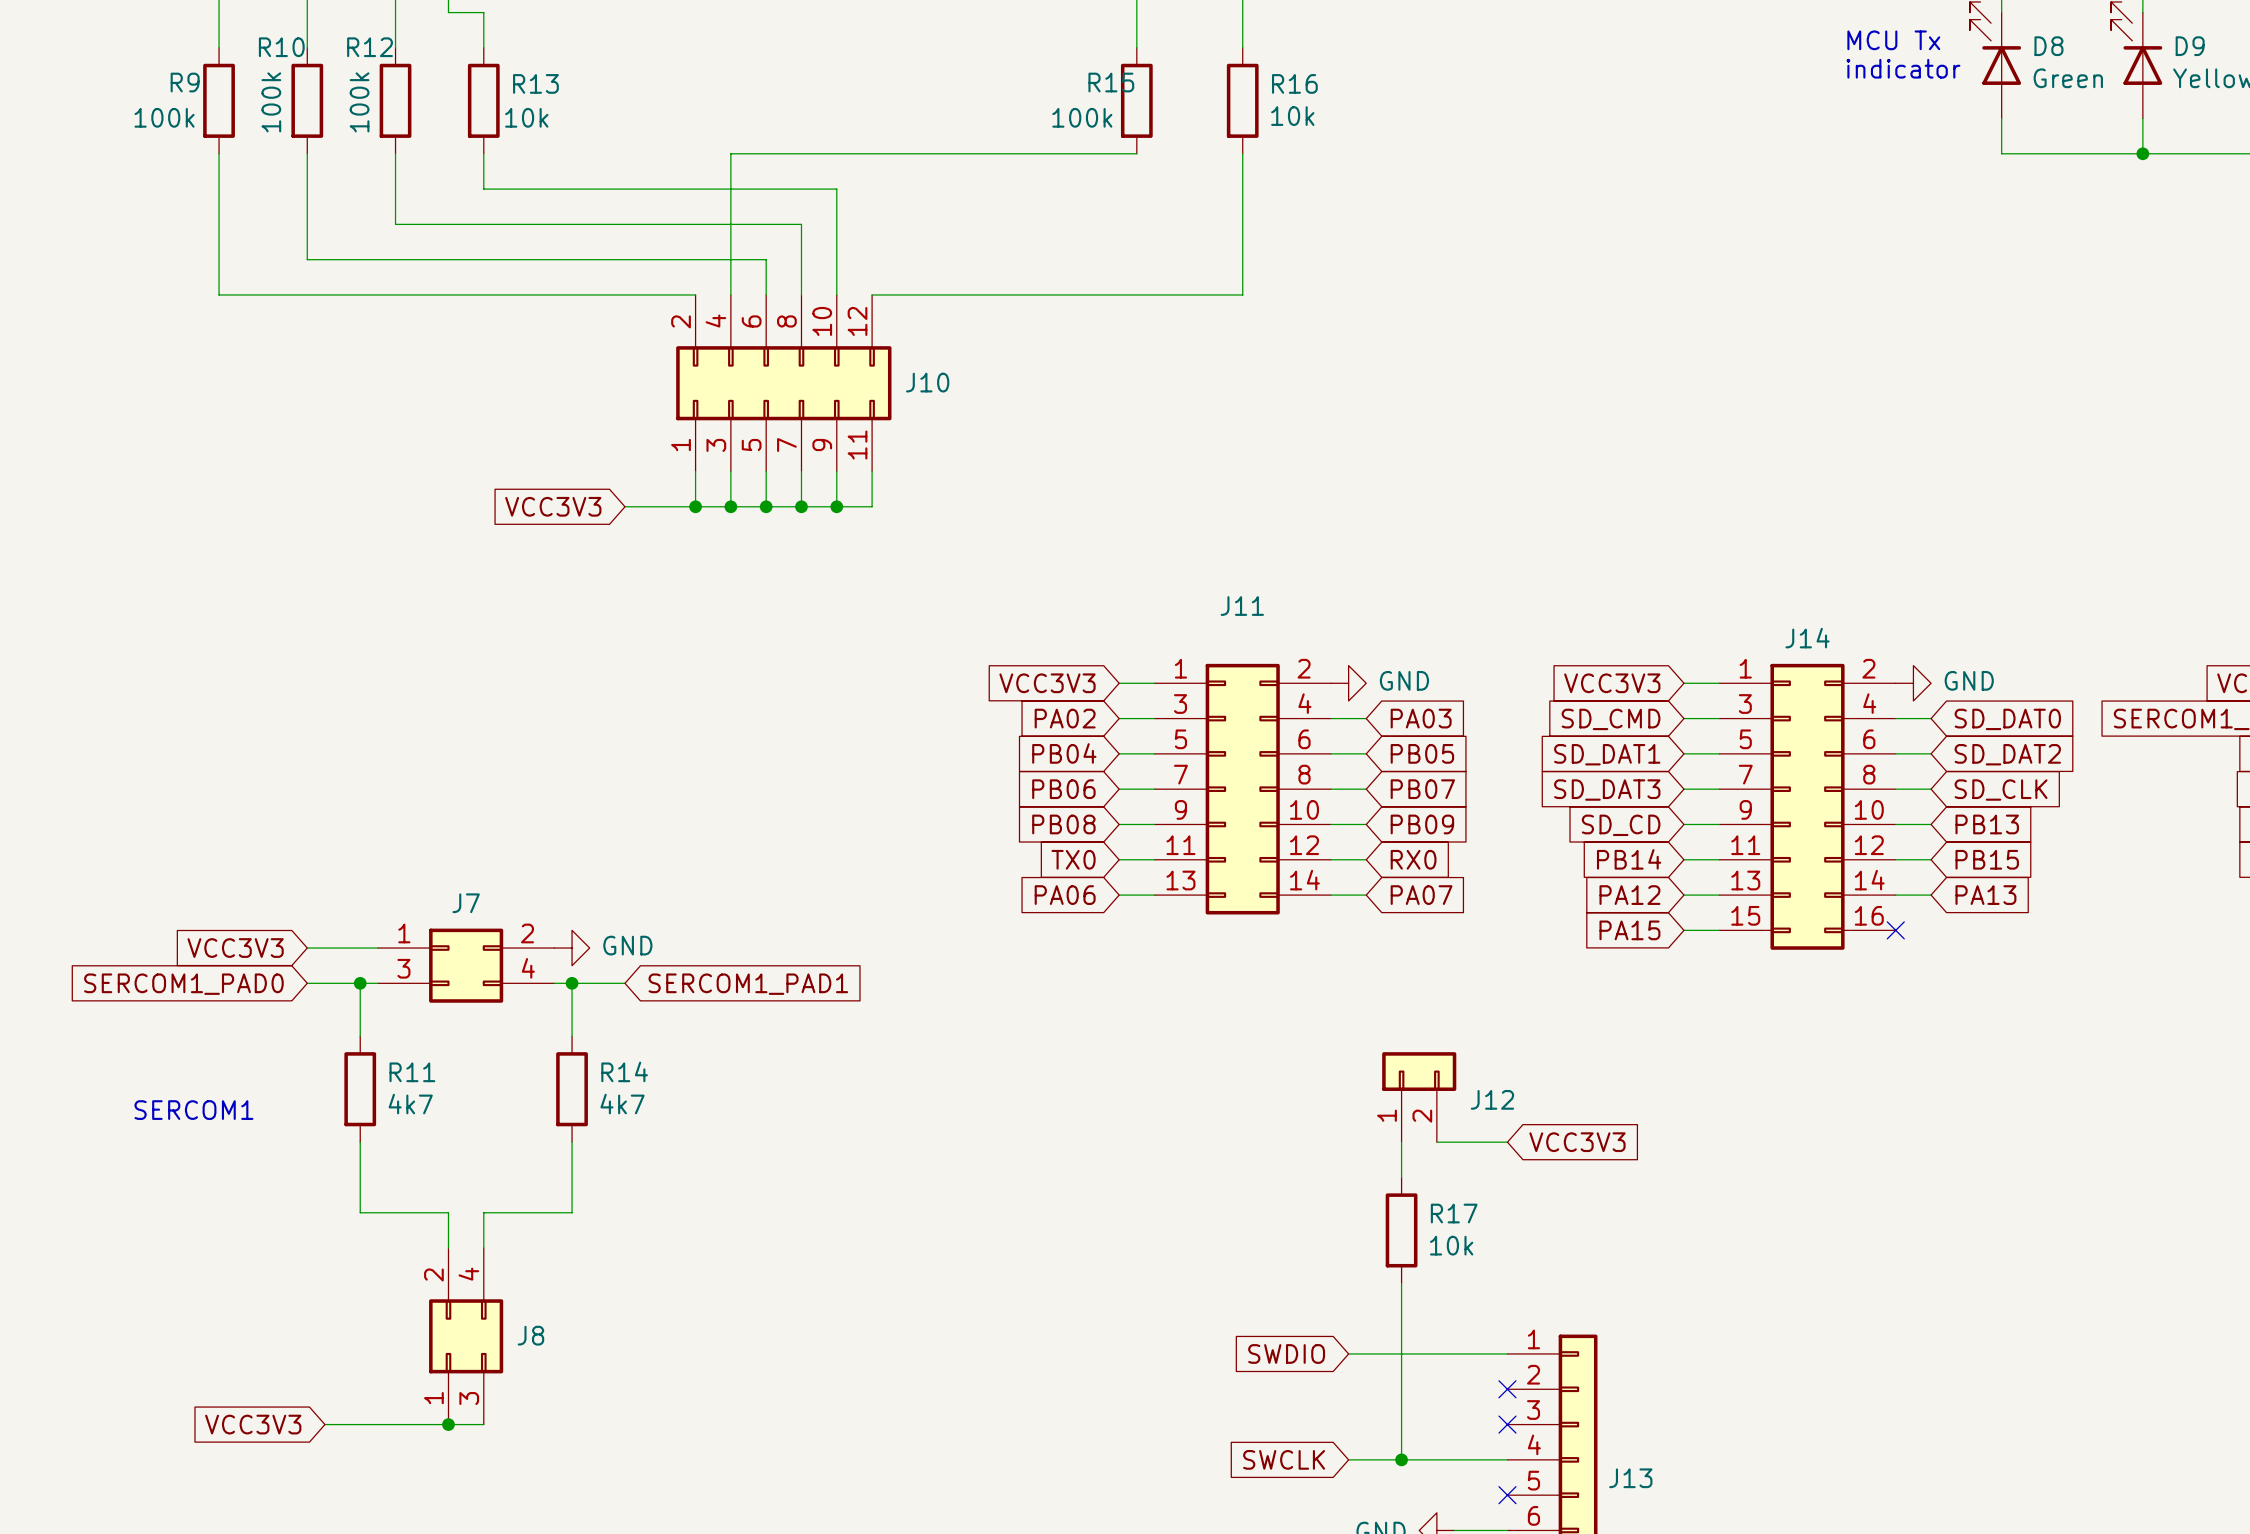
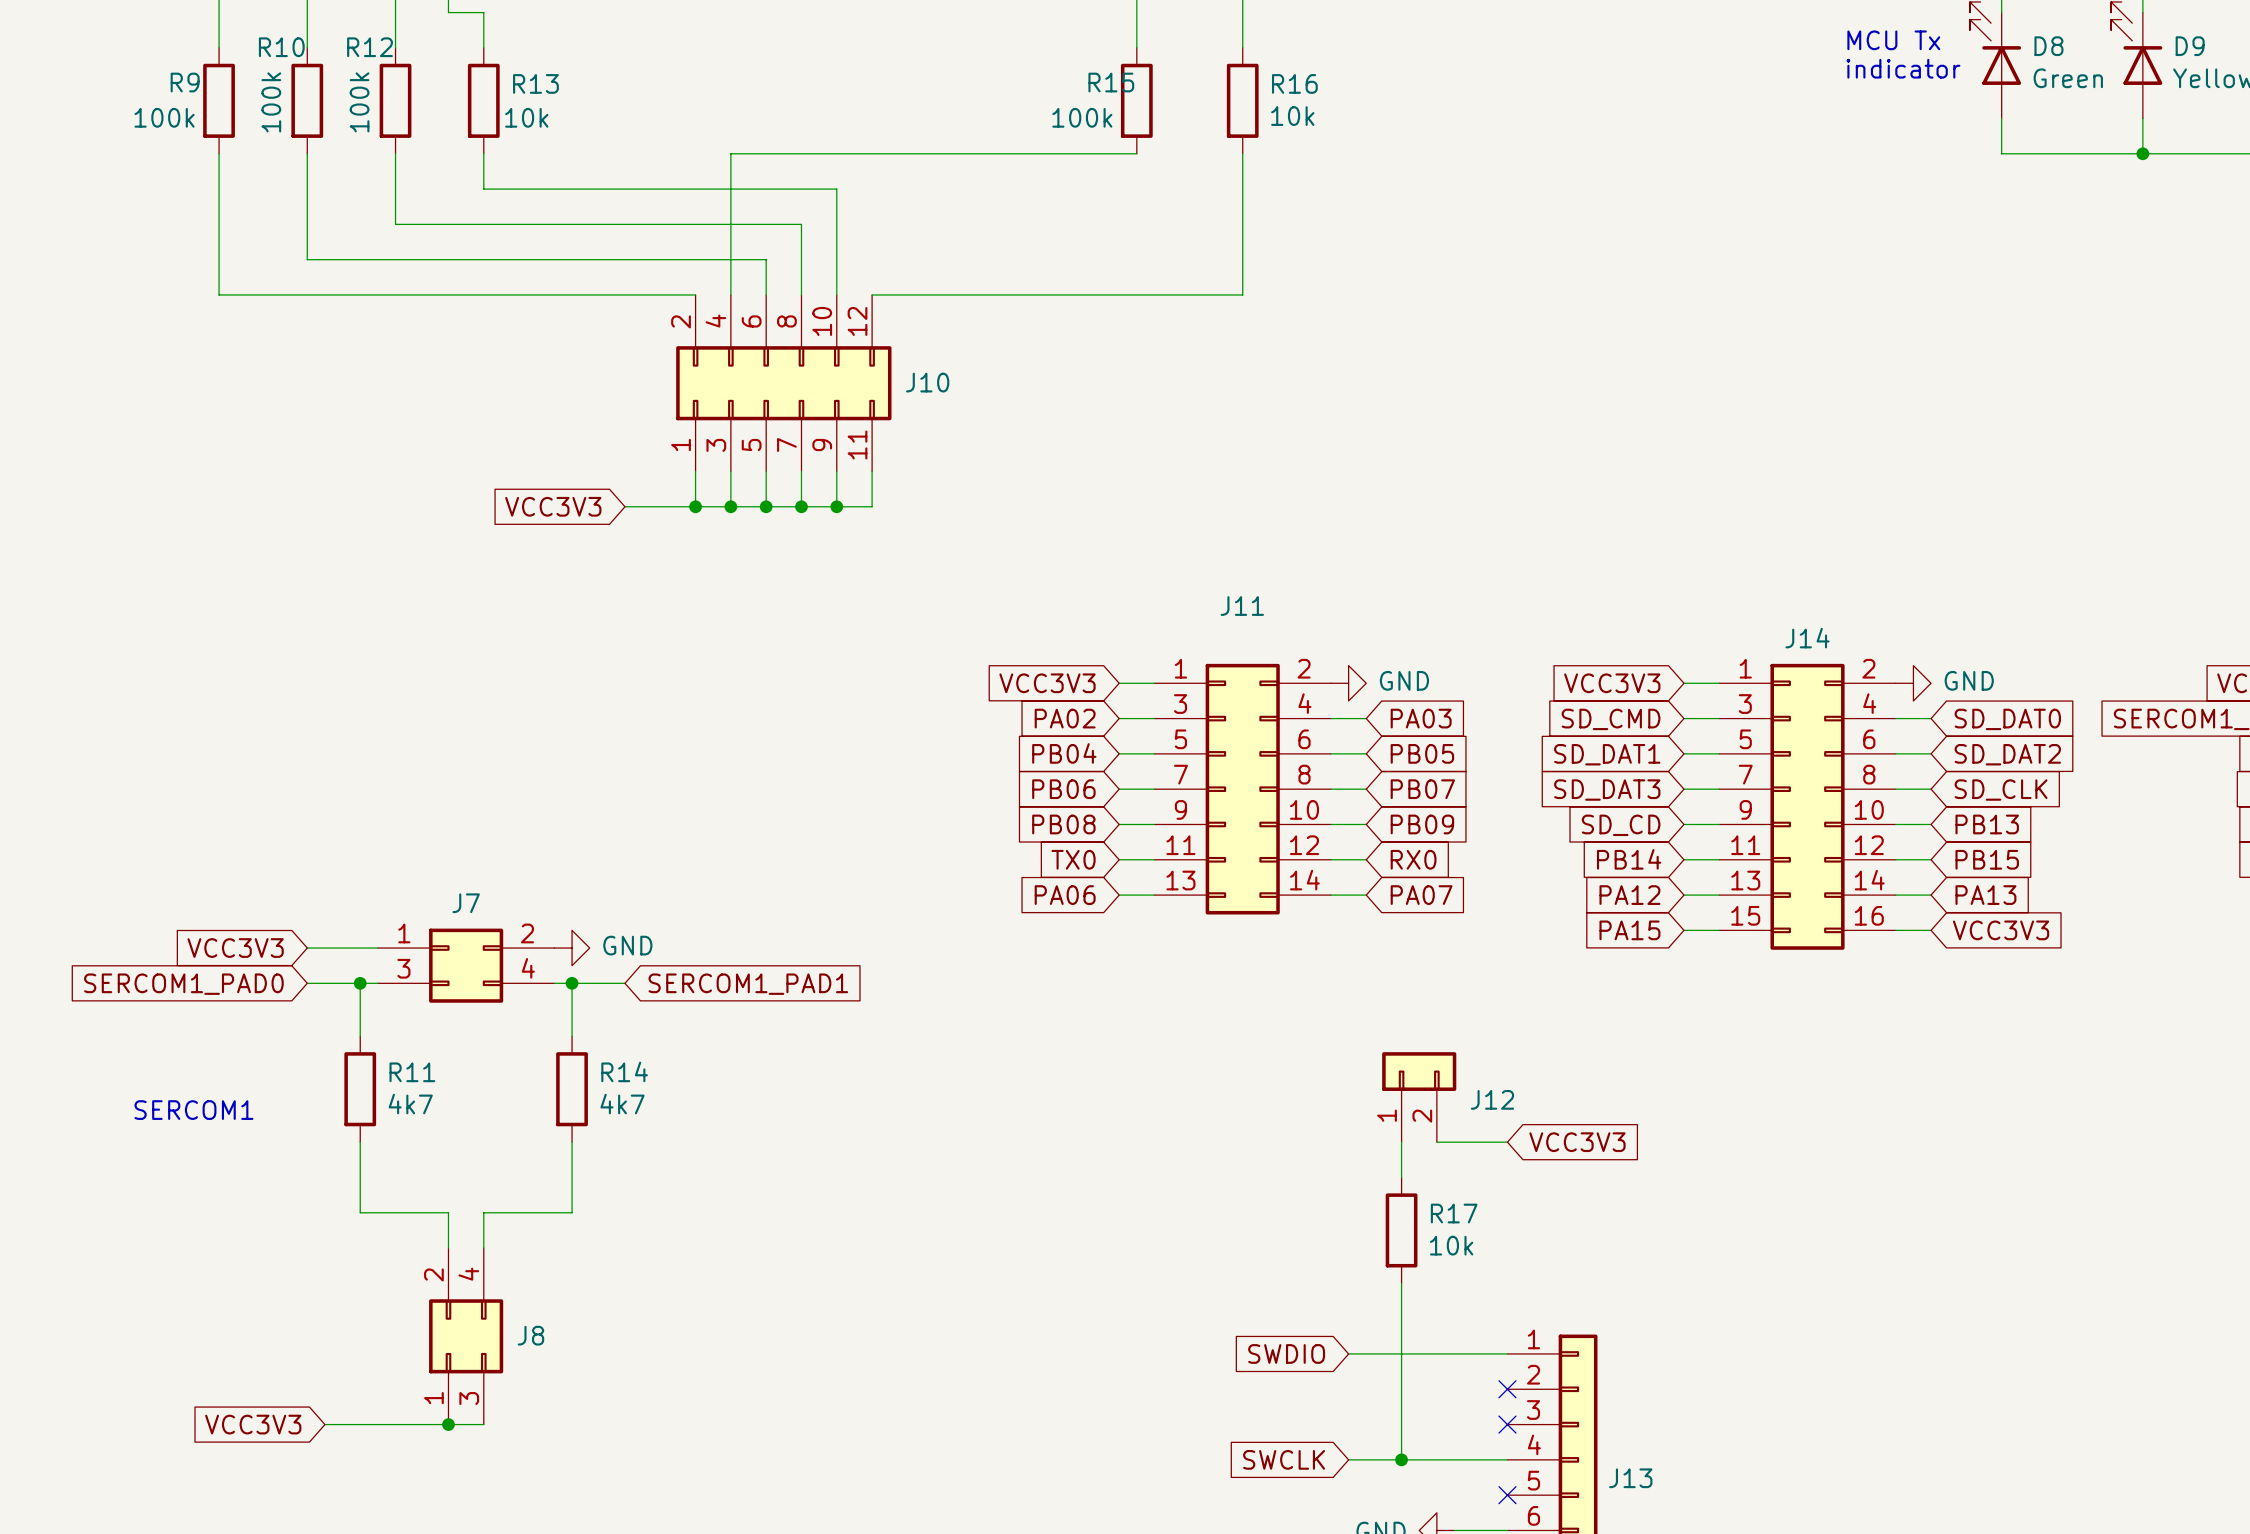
wire: none -> (1895, 930) (1931, 930)
no-connect mark: (1895, 930) -> none
global label: none -> VCC3V3 (2001, 930)

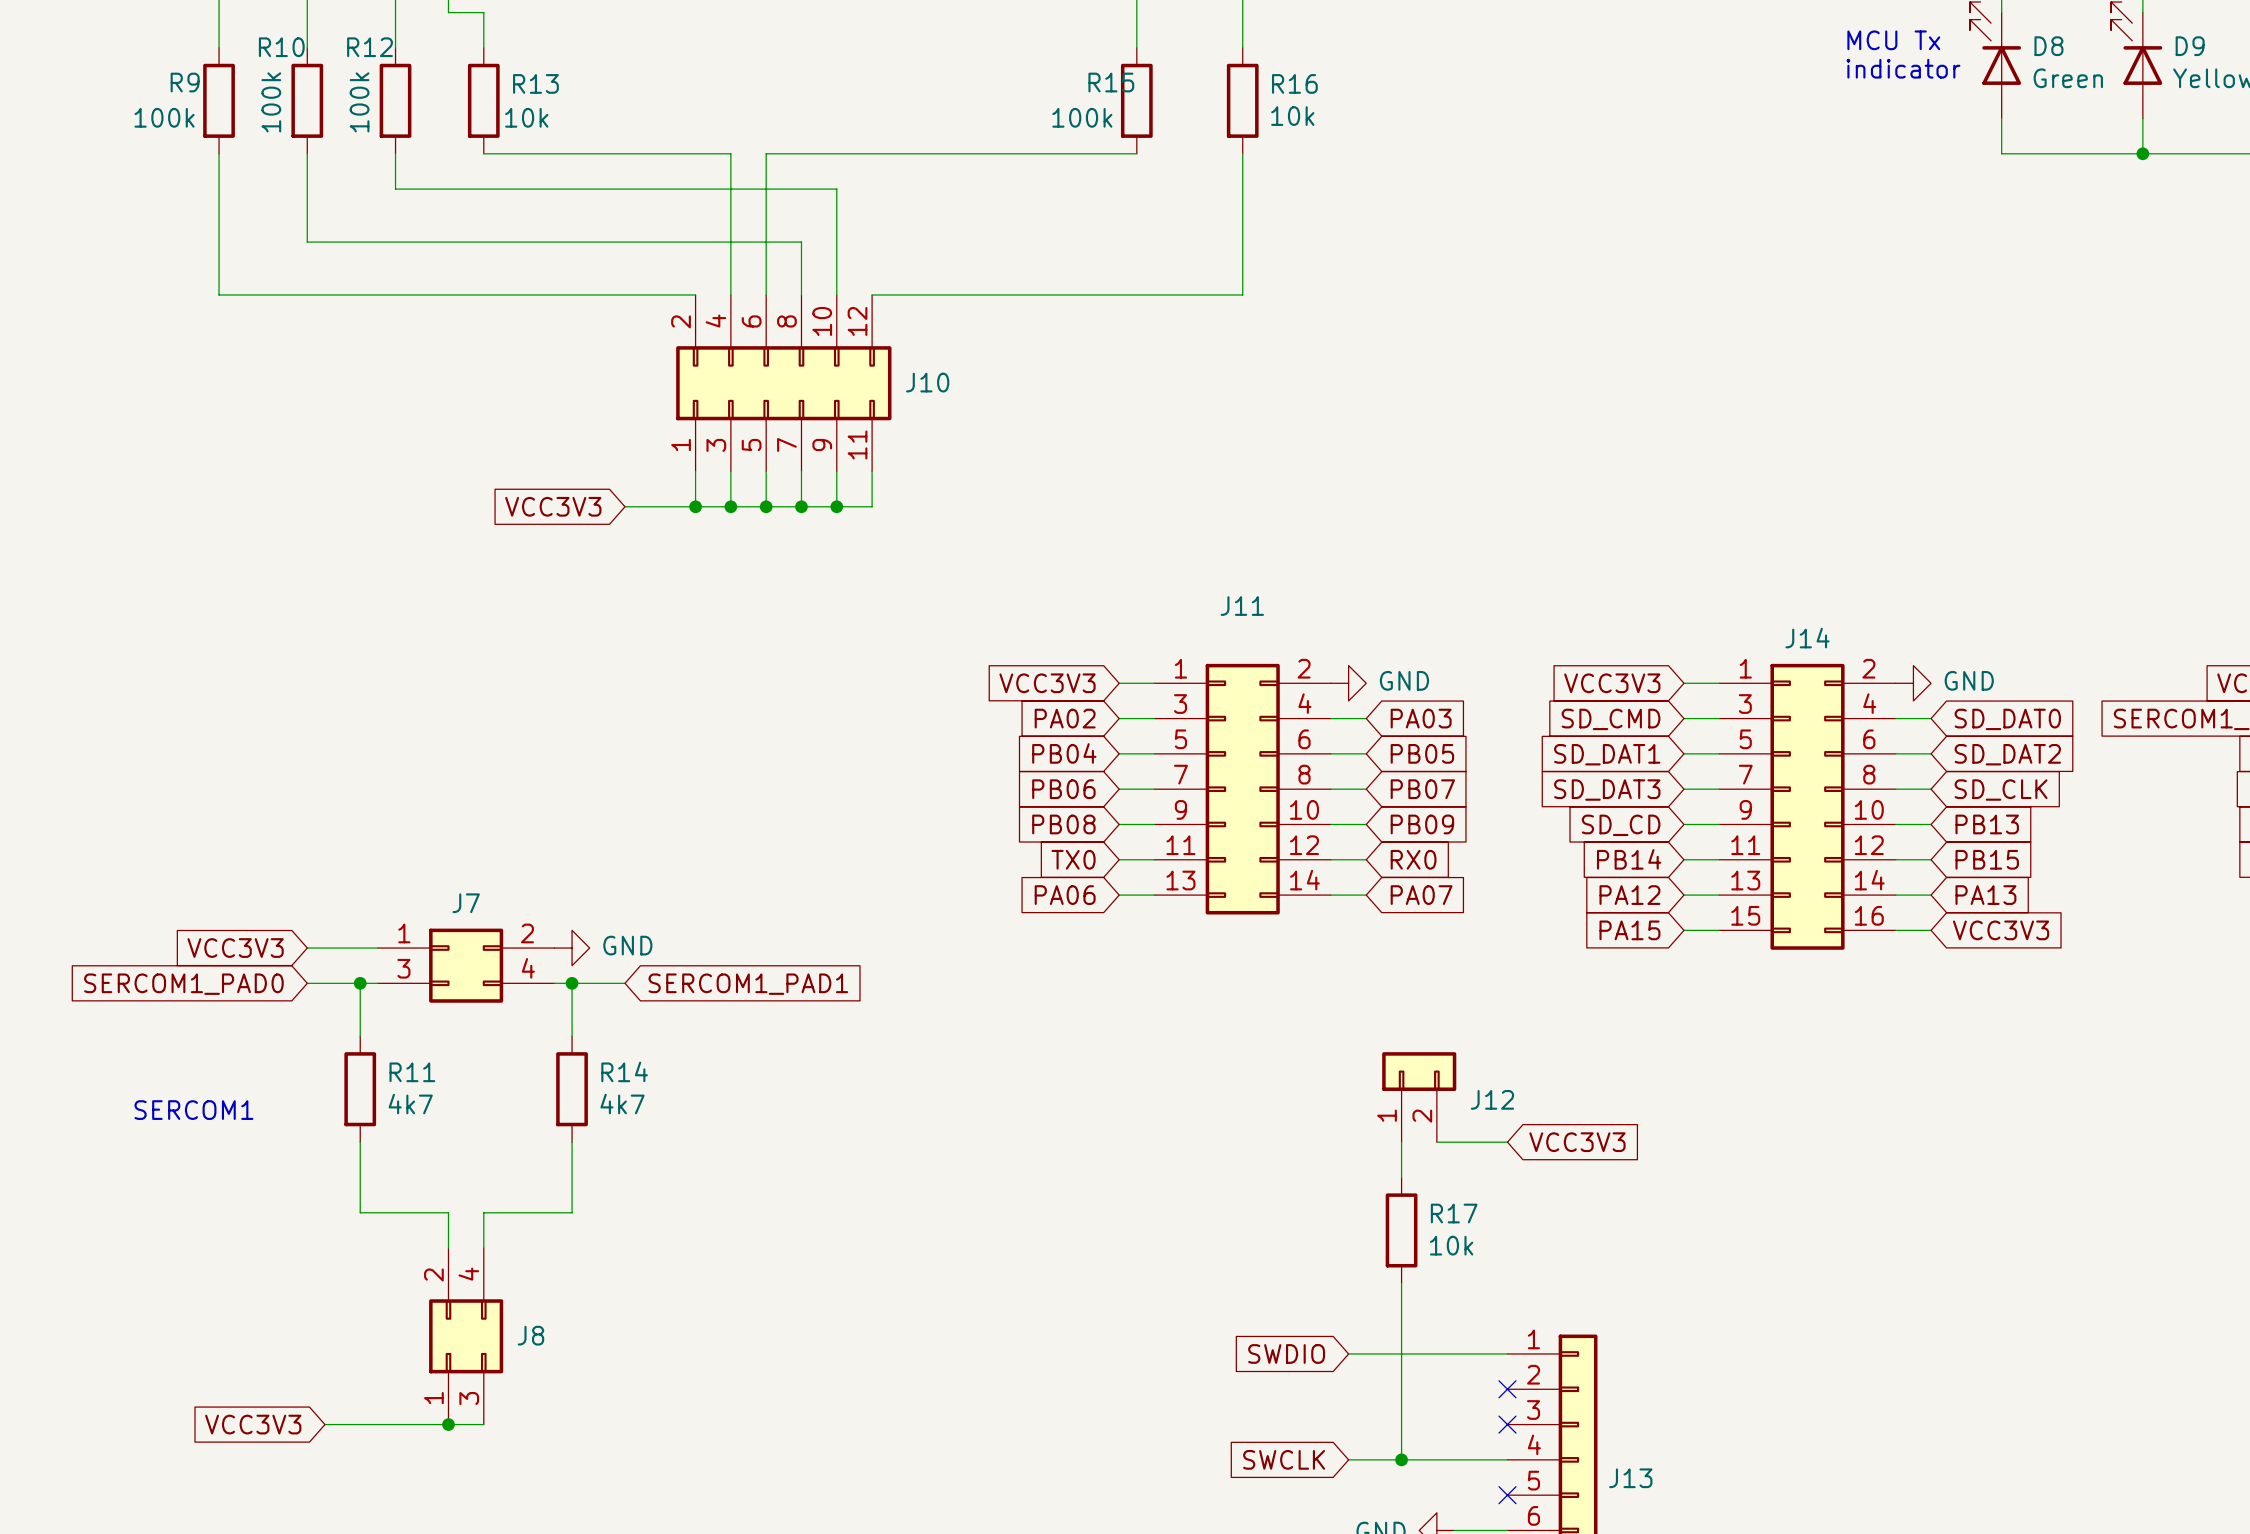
wire: (483, 153) (483, 189) -> (395, 189) (483, 189)
wire: none -> (483, 153) (730, 153)
wire: (730, 153) (766, 153) -> (766, 259) (766, 153)
wire: (395, 189) (395, 224) (801, 224) (801, 242) -> none
wire: (307, 242) (307, 259) (766, 259) -> (307, 242) (801, 242)

